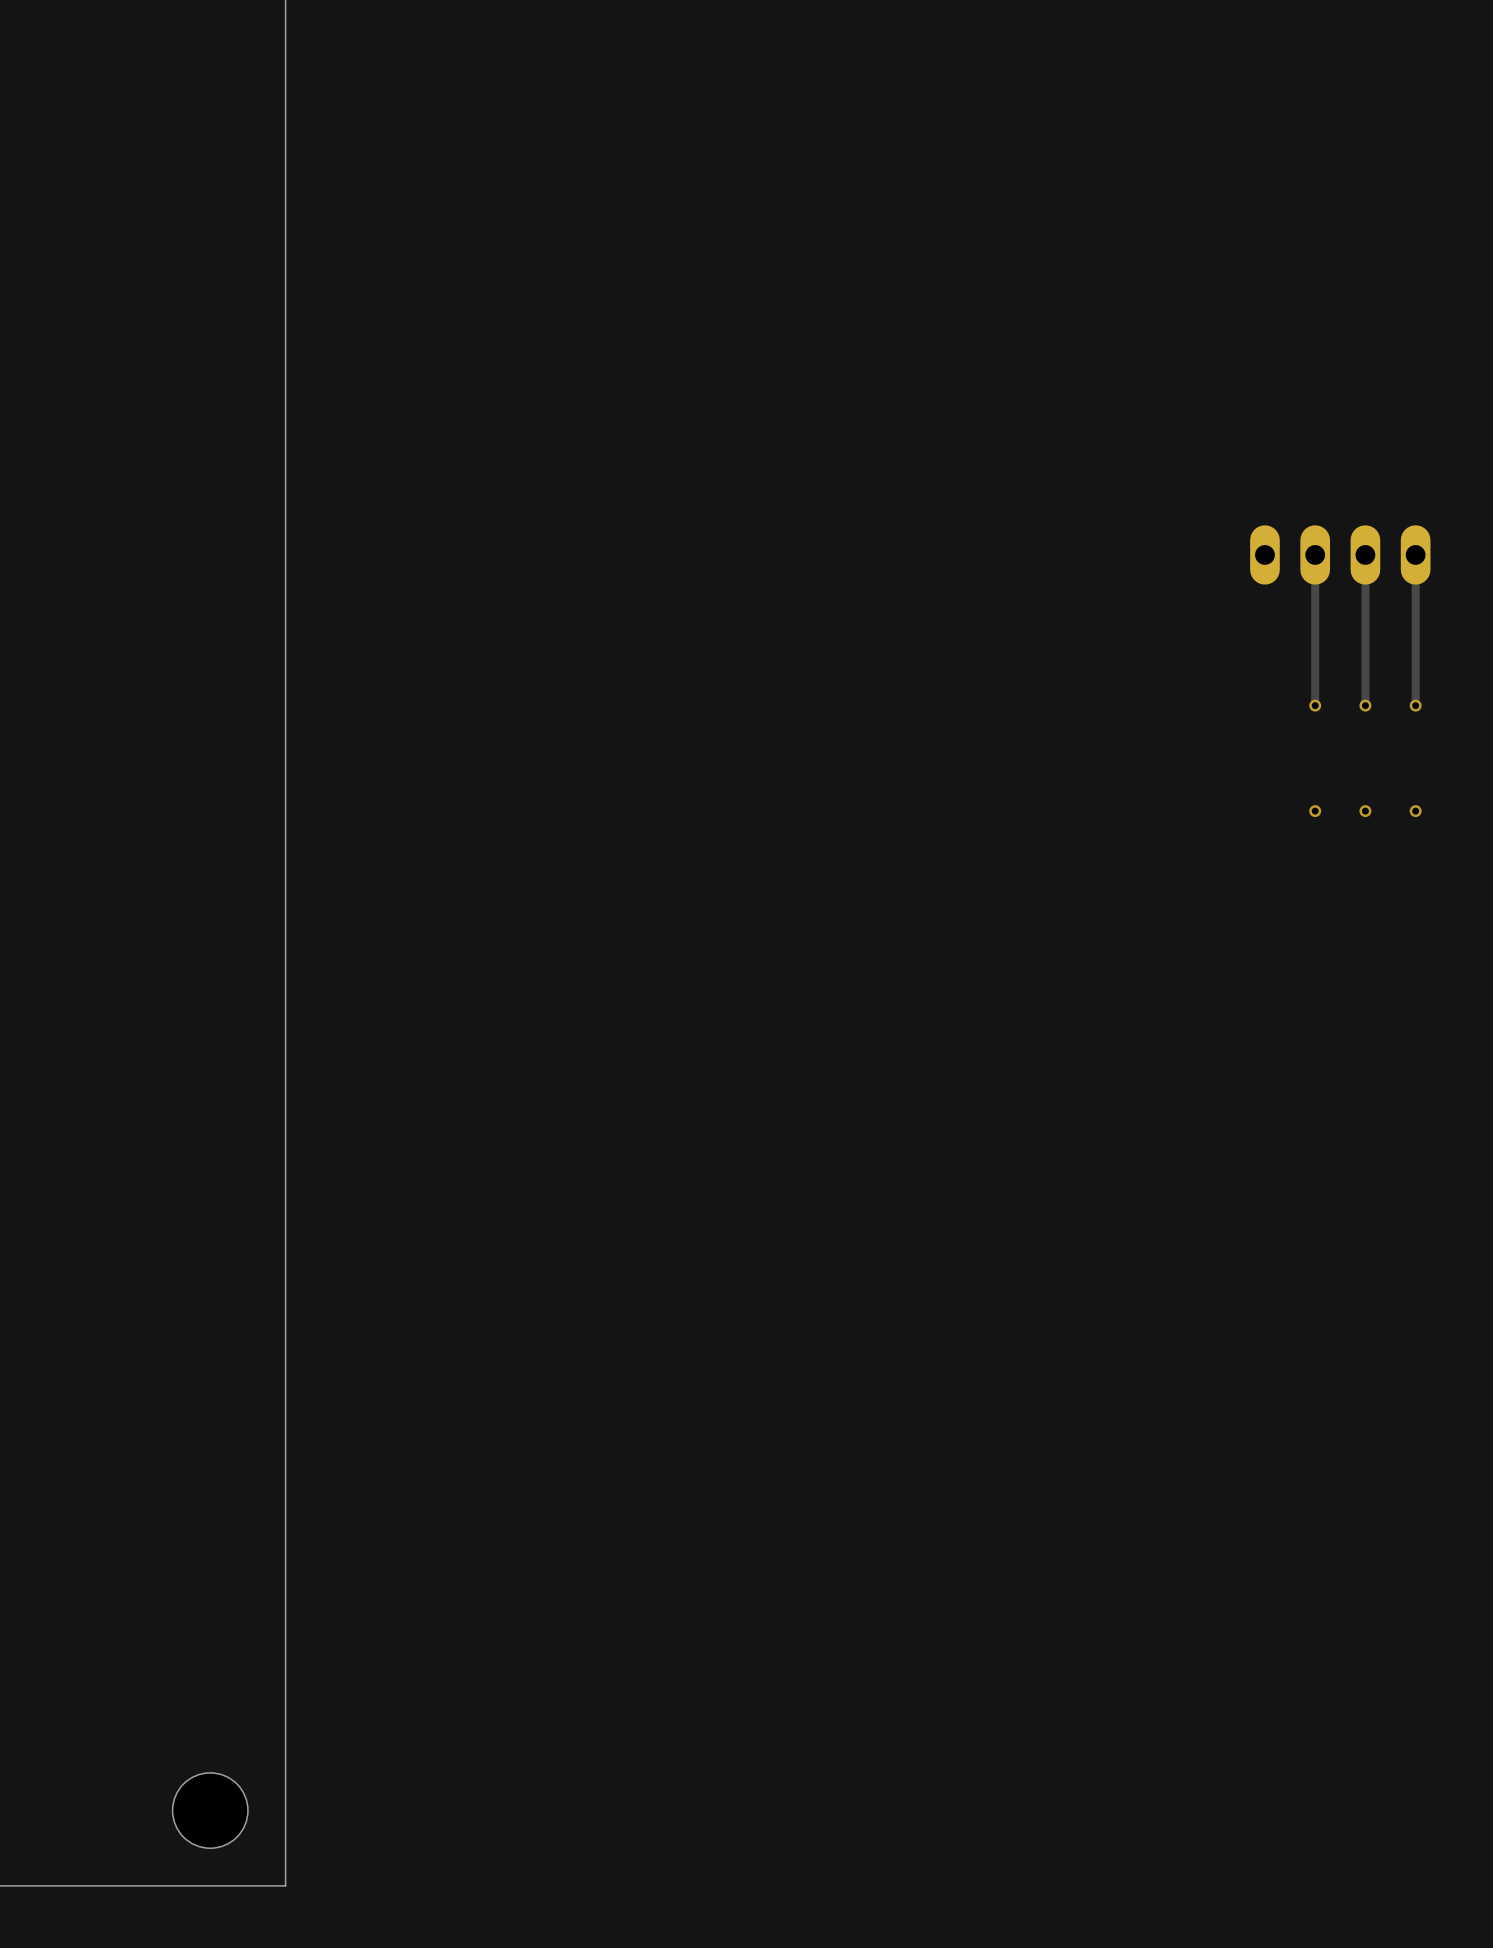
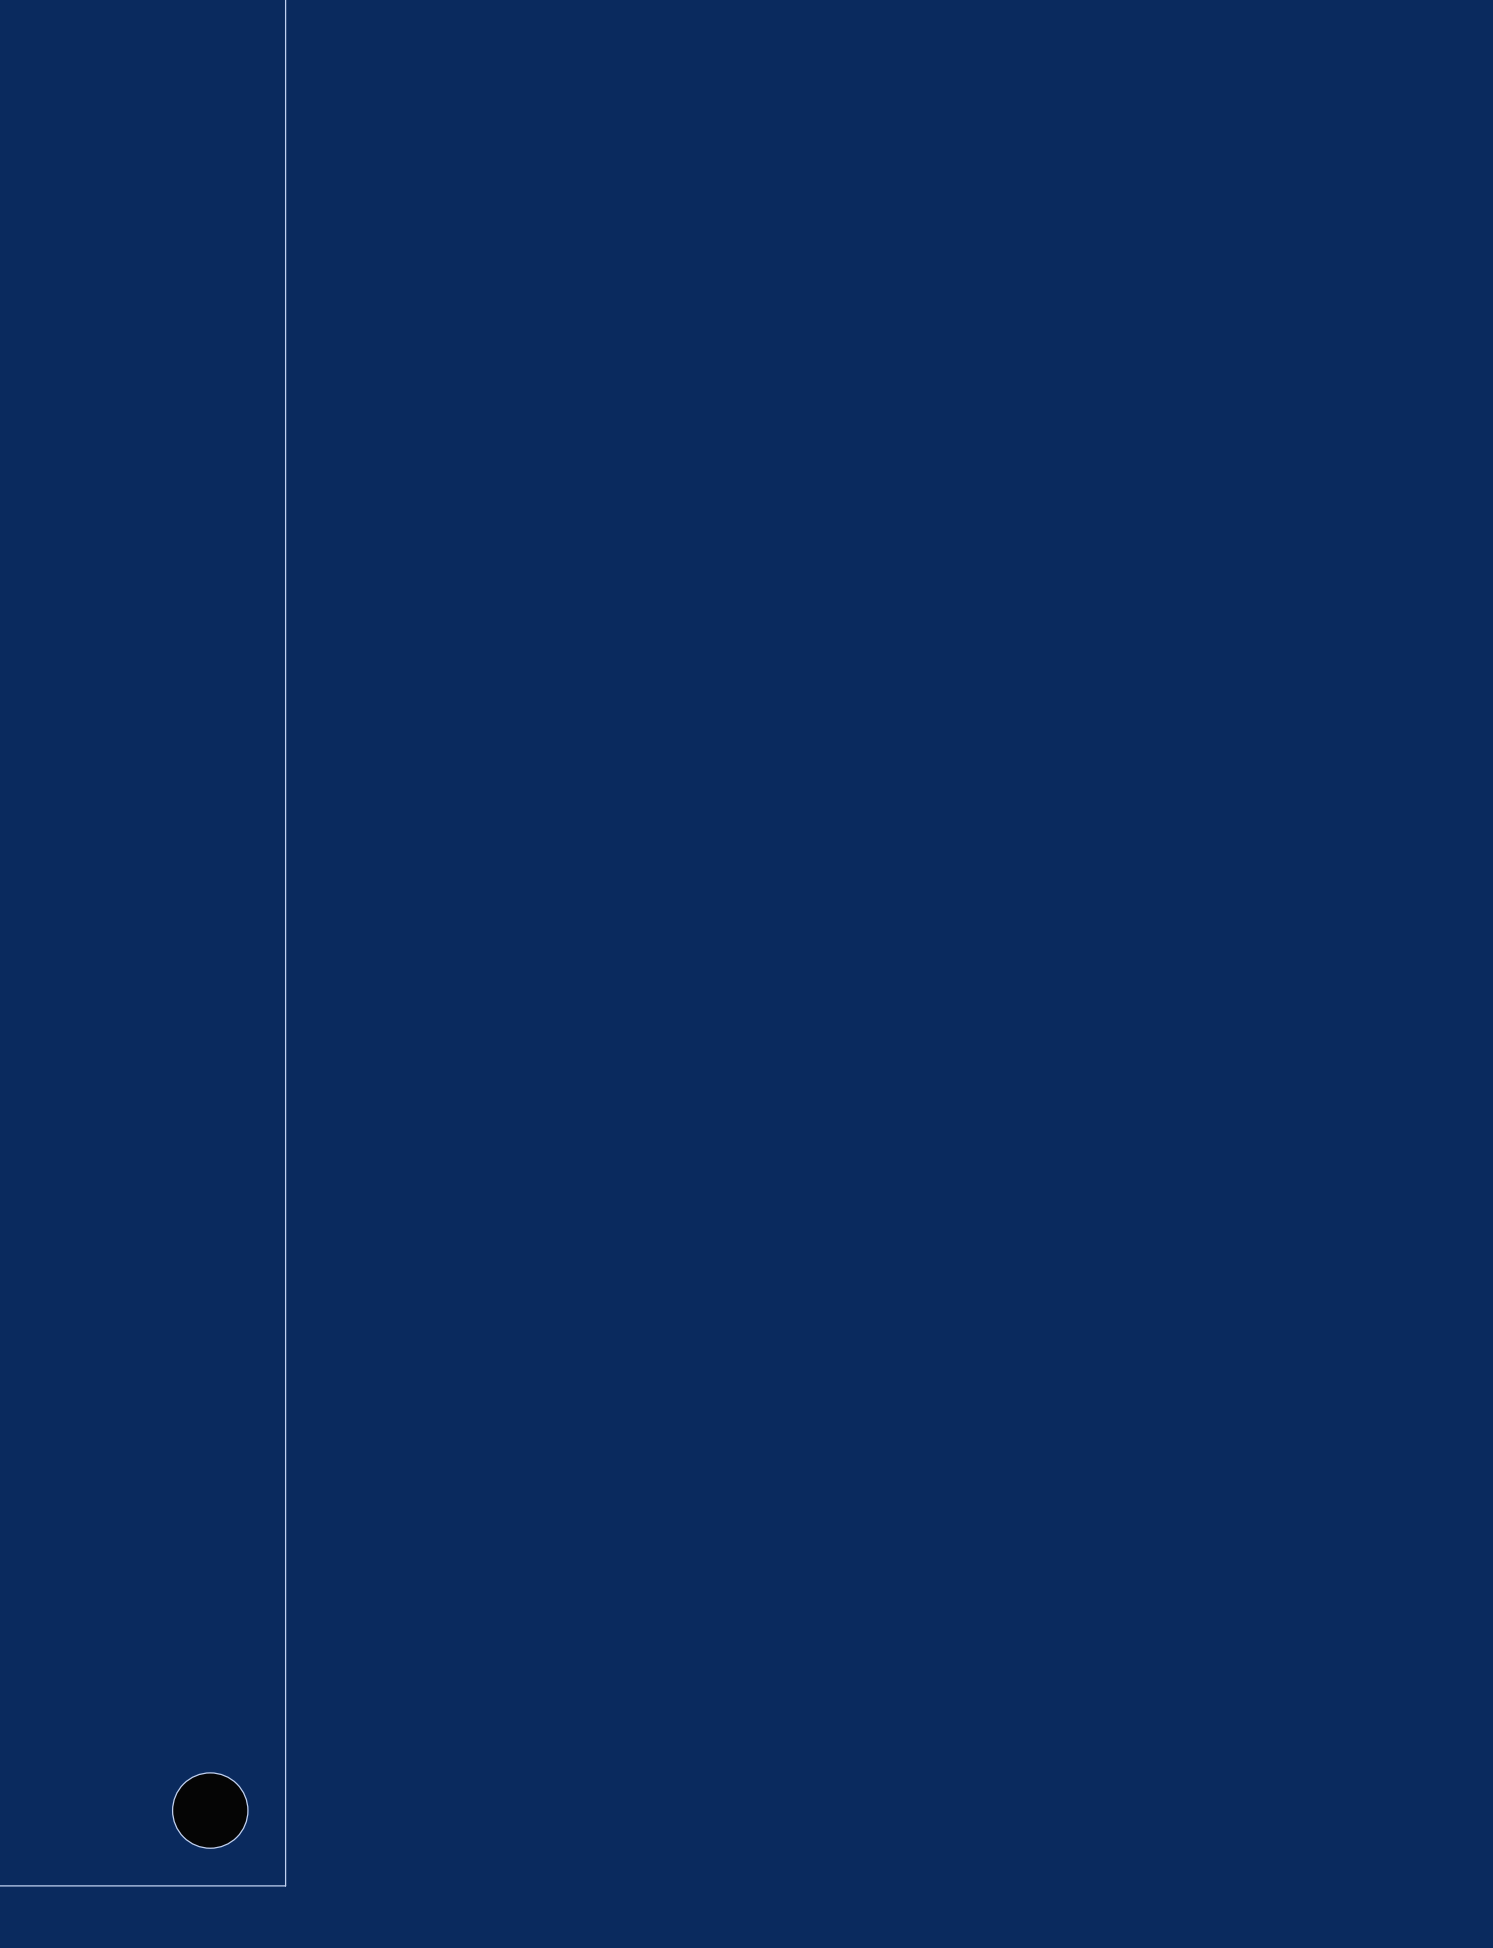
track: (1315, 554) (1315, 705) -> none
part: (1340, 554) -> none
track: (1365, 554) (1365, 705) -> none
track: (1415, 554) (1415, 705) -> none
via: (1315, 705) -> none
via: (1365, 705) -> none
via: (1415, 705) -> none
via: (1315, 811) -> none
via: (1365, 811) -> none
via: (1415, 811) -> none

